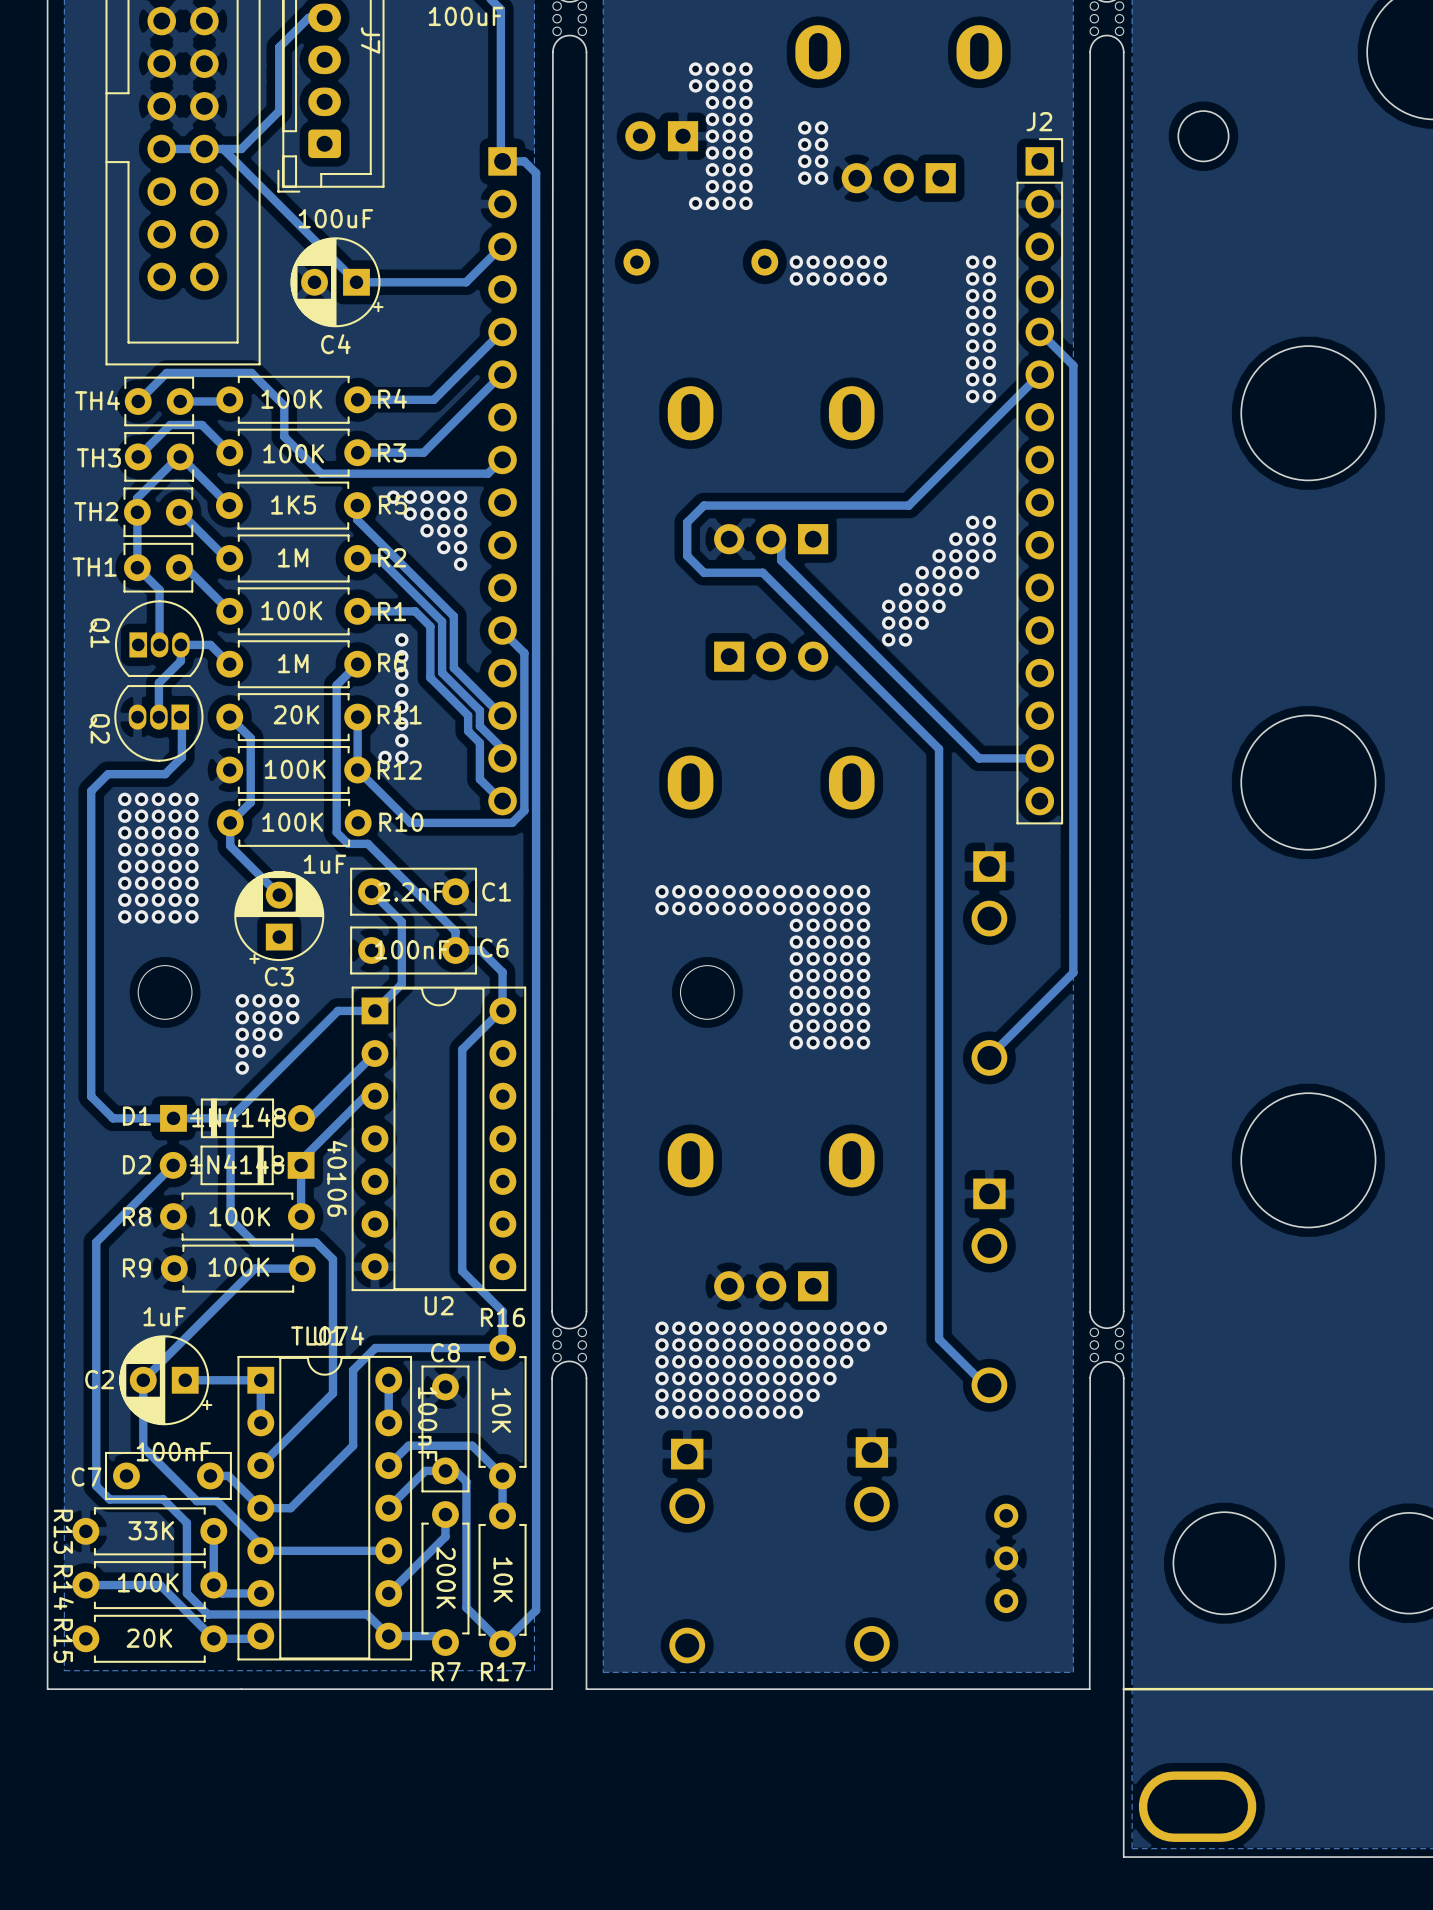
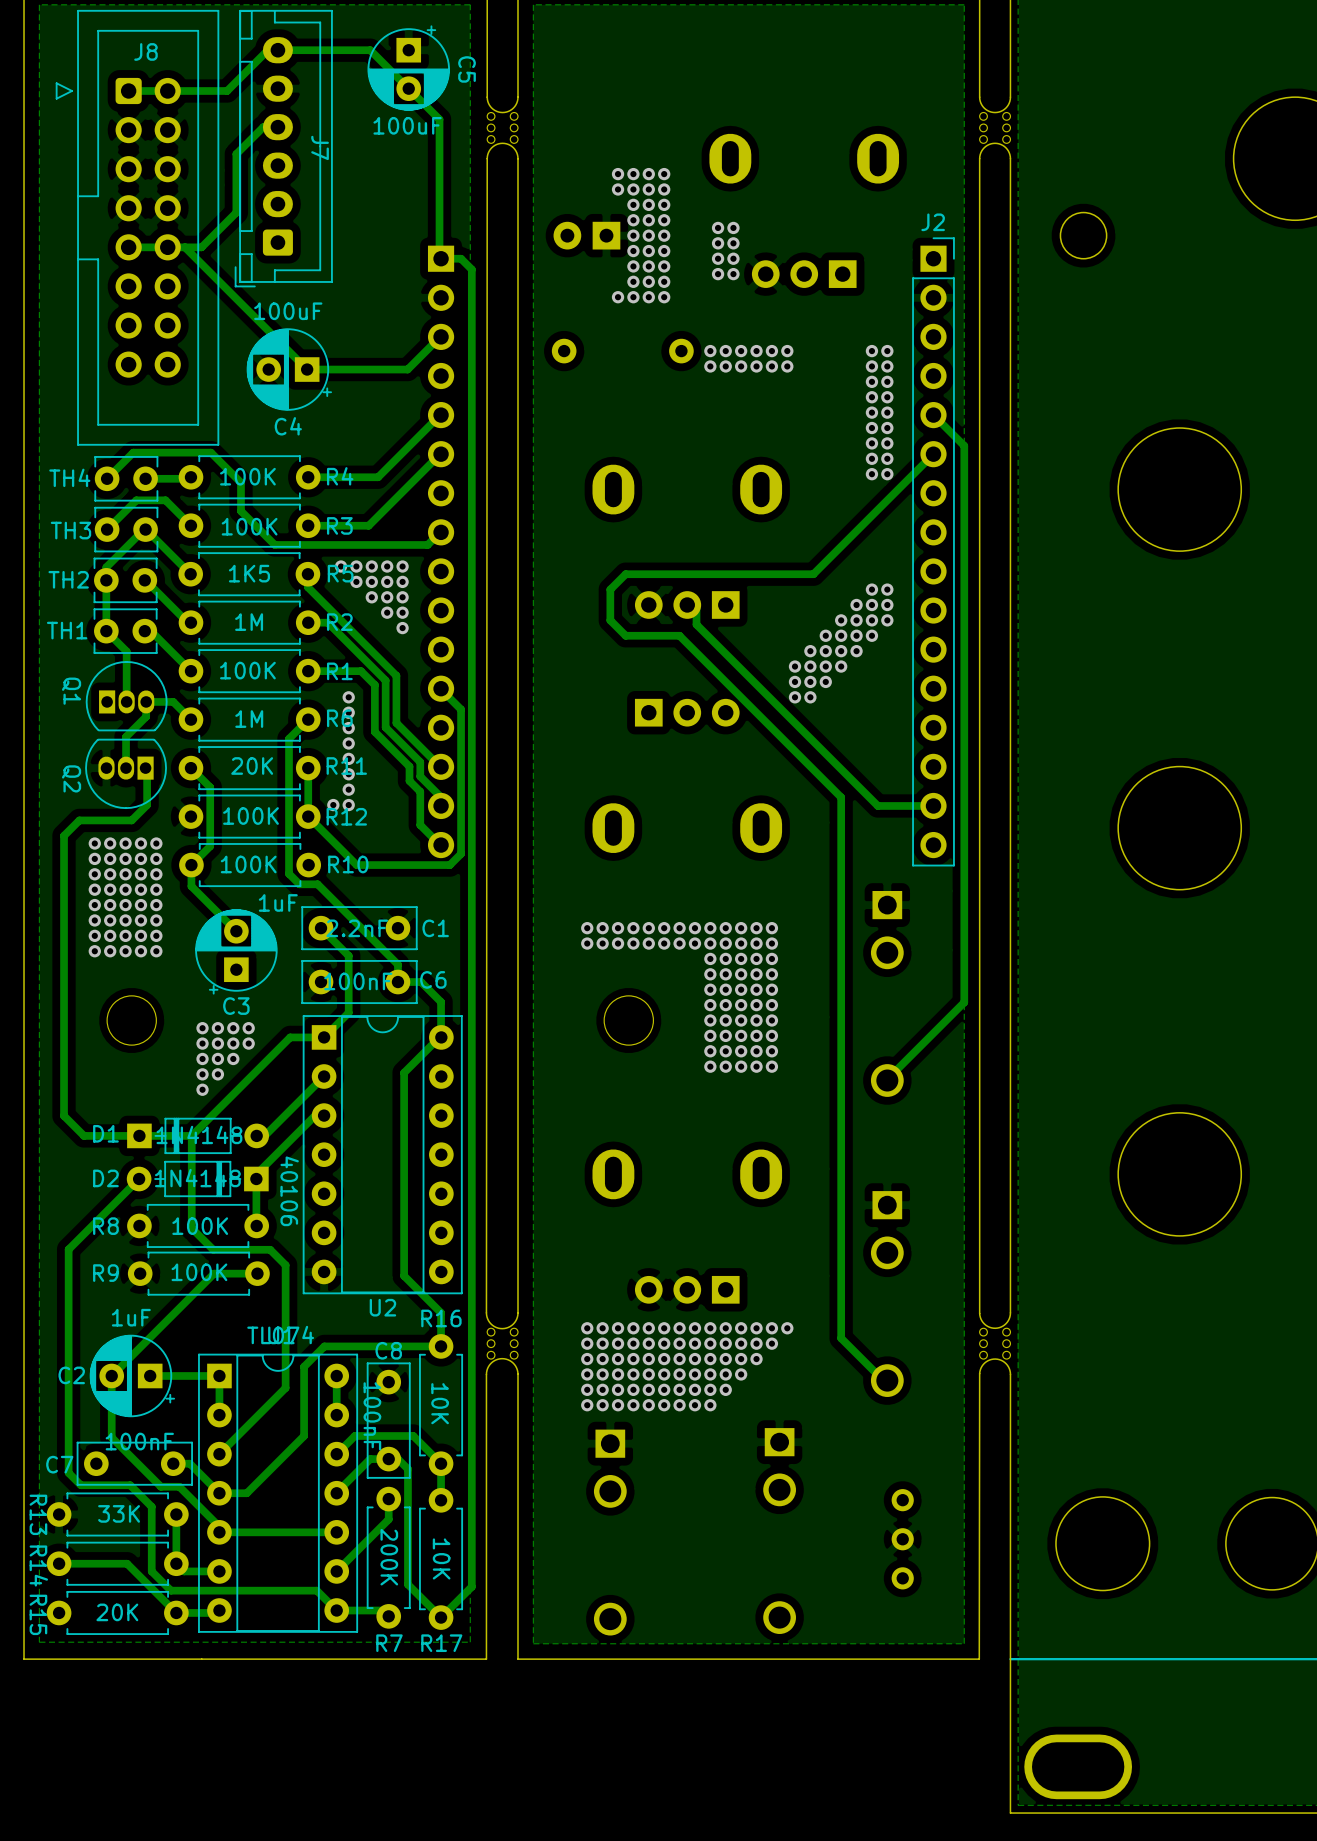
R14 value: 100K (148, 1582) -> none

